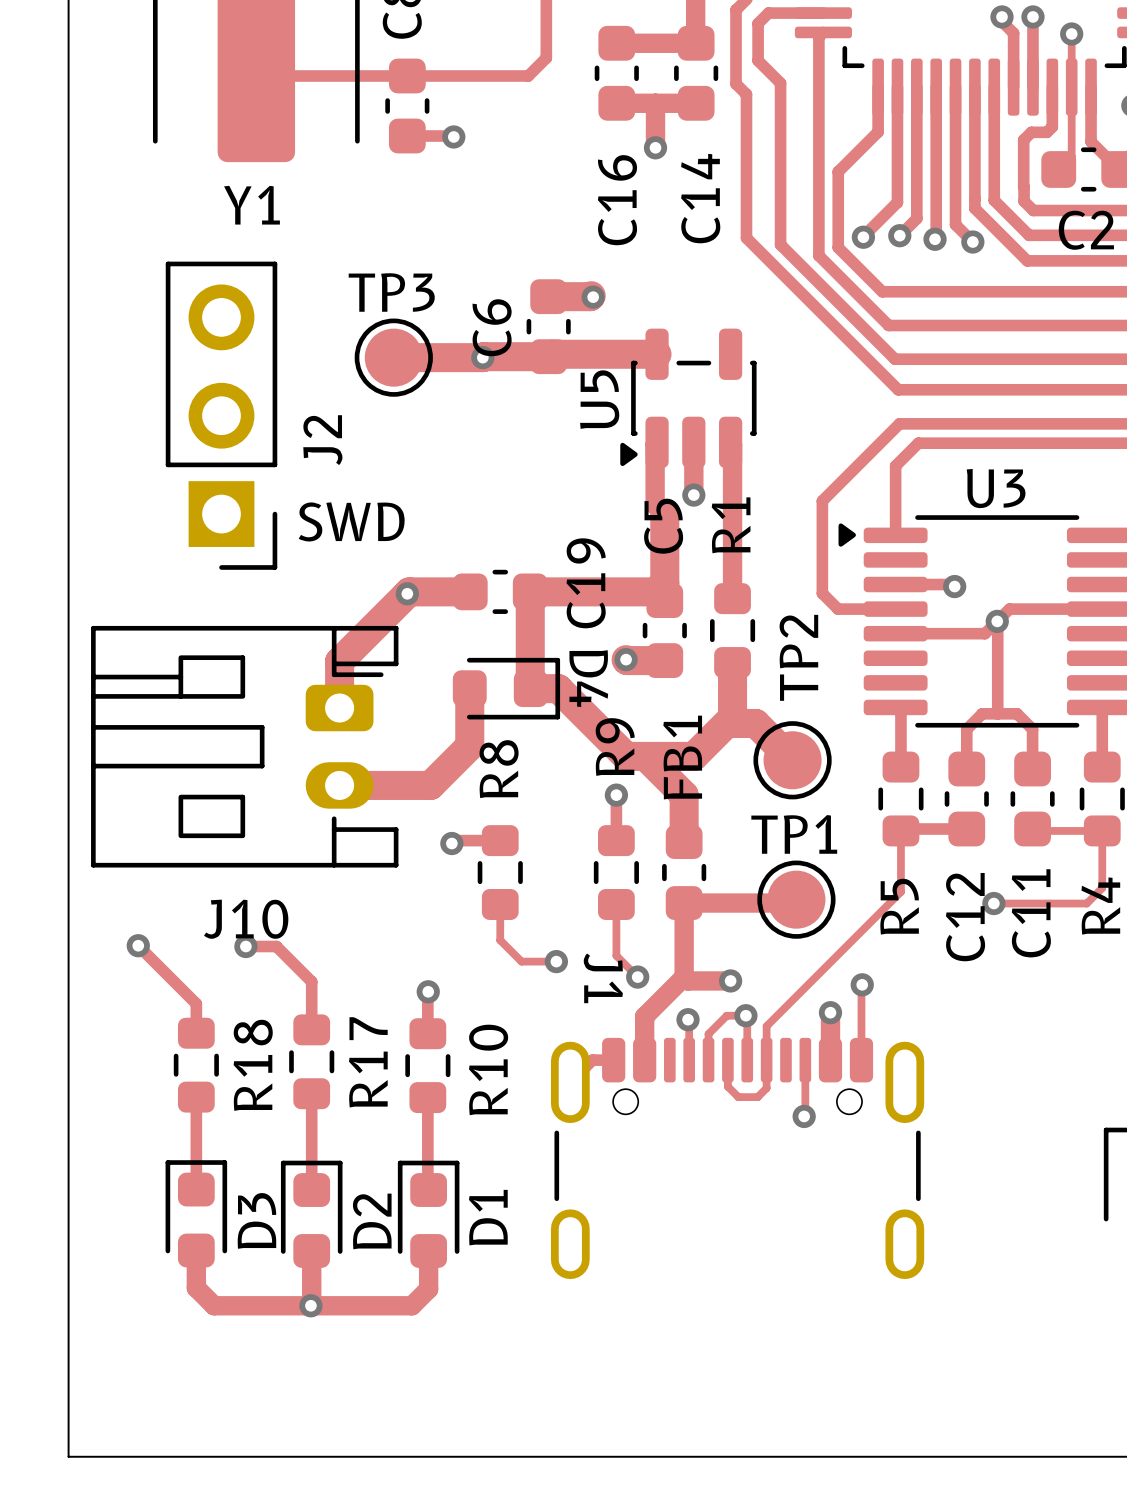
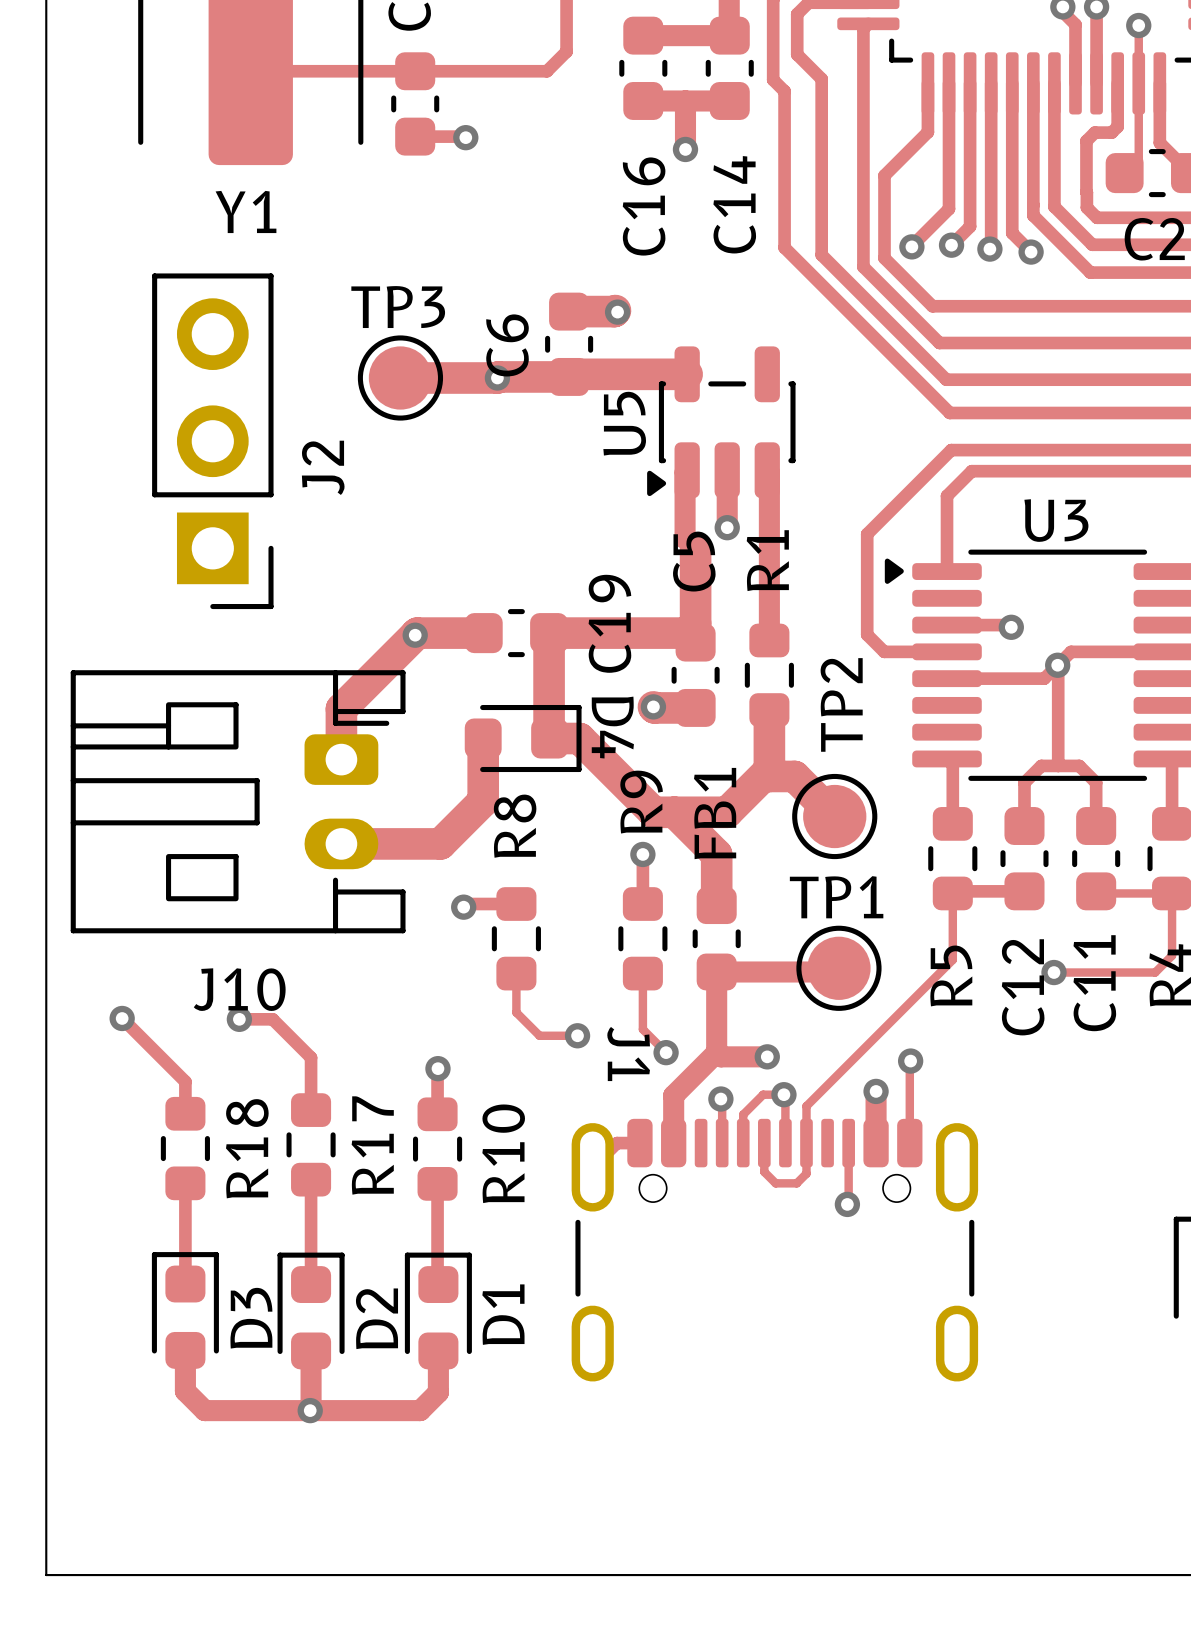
text: SWD (351, 521) -> none

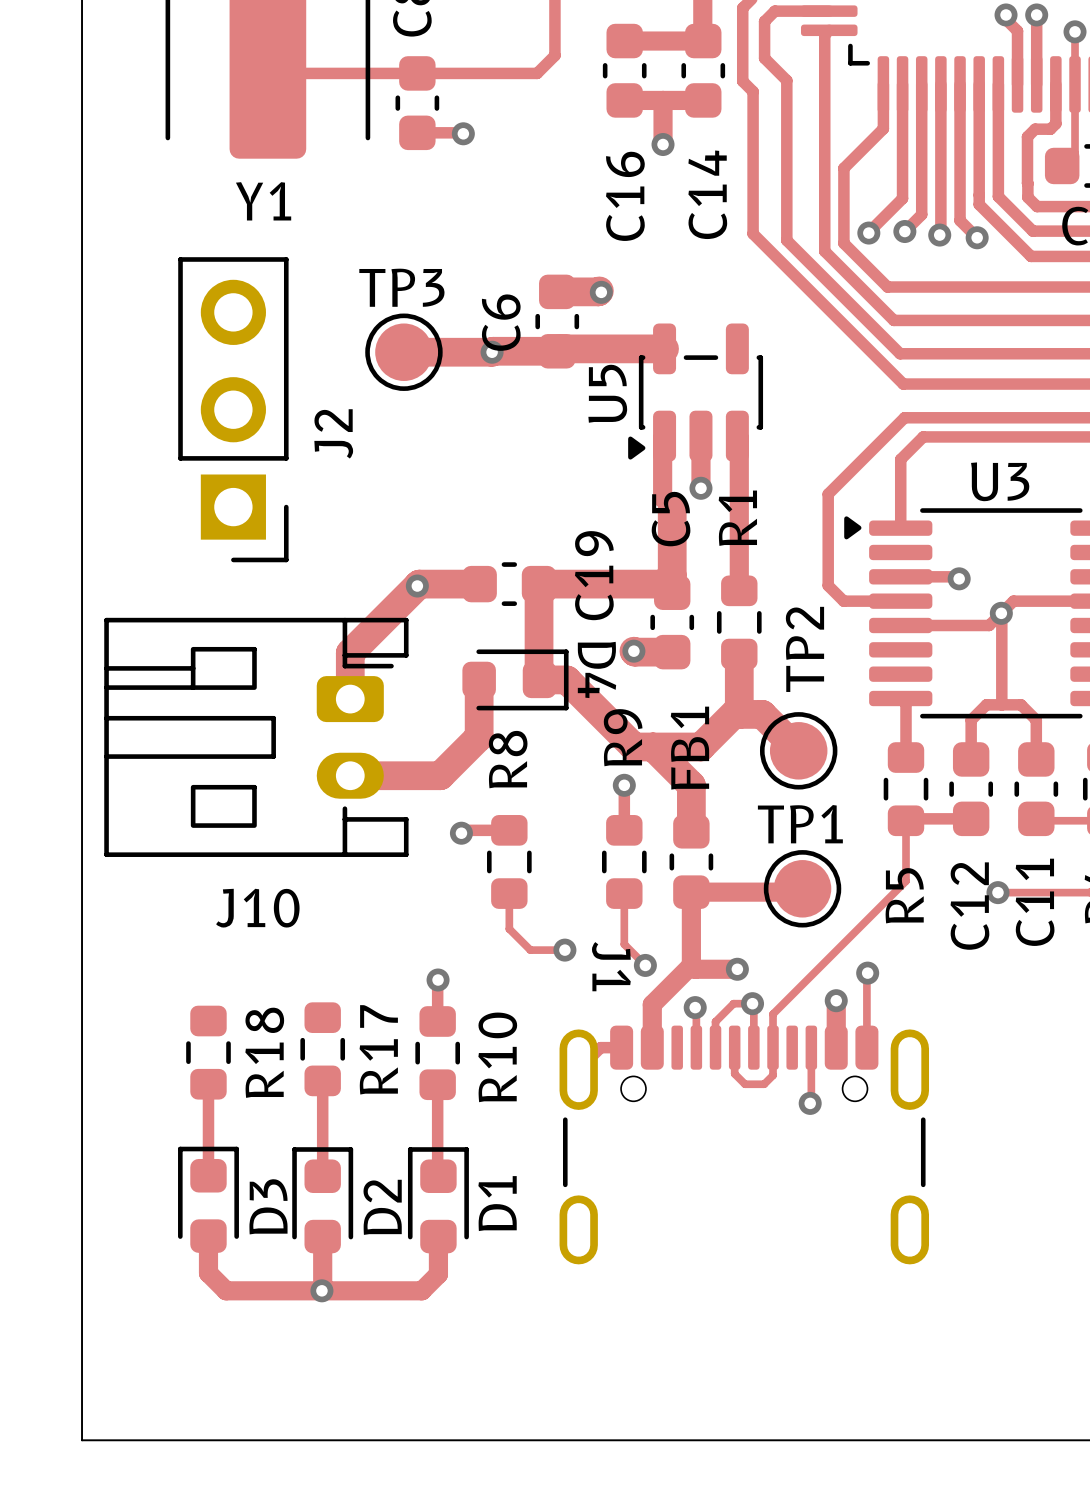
track: (122, 1018) (185, 1081) (185, 1113) -> none
via: (122, 1018) -> none
track: (239, 1019) (272, 1019) (311, 1057) (311, 1110) -> none
via: (239, 1019) -> none

